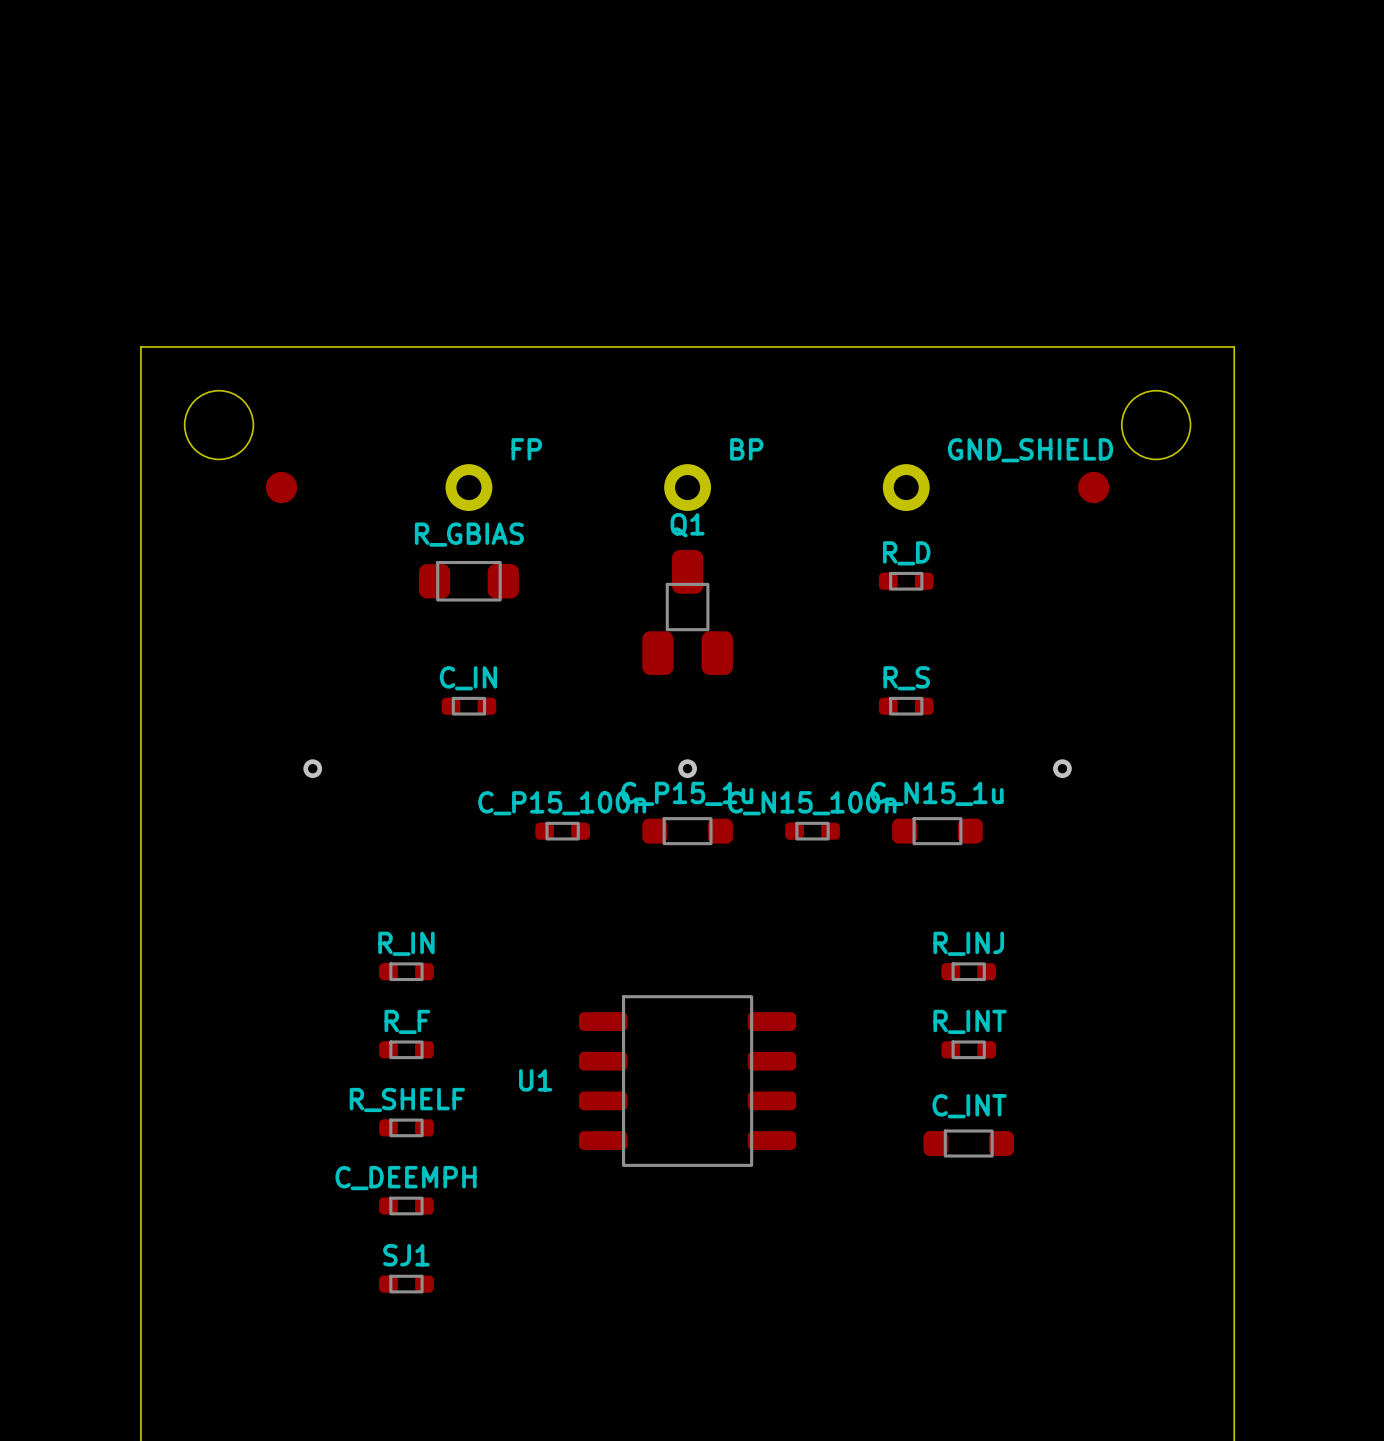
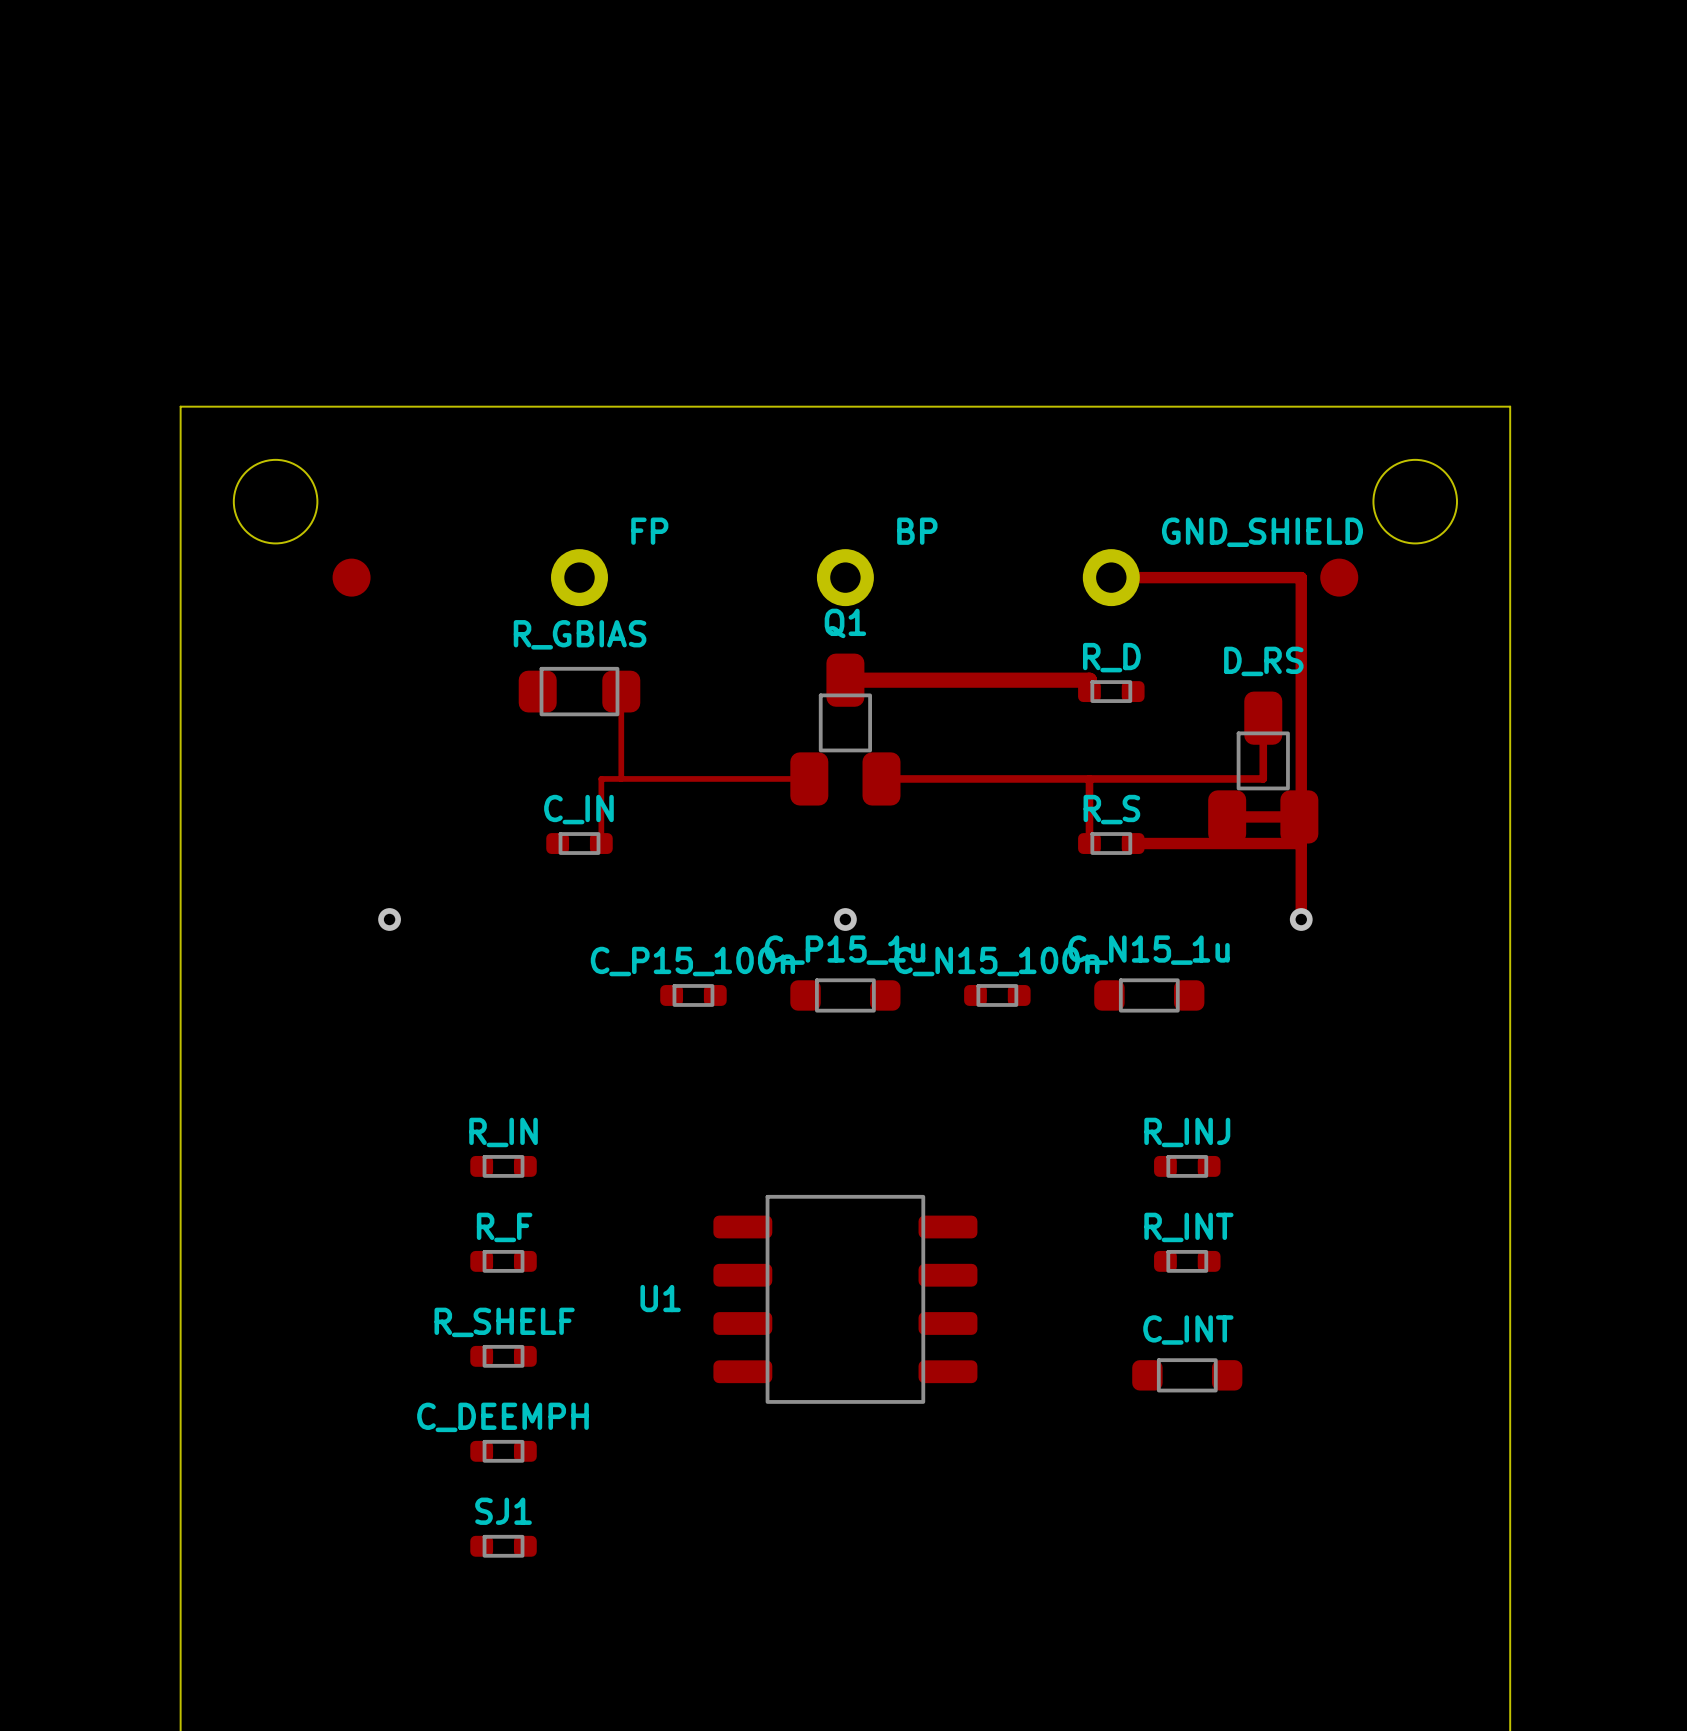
top track: none -> (1111, 577) (1301, 577) (1301, 919)
top track: none -> (845, 680) (1089, 680) (1089, 691)
top track: none -> (621, 691) (621, 778)
top track: none -> (1263, 718) (1263, 778) (881, 778)
D_RS: none -> (1263, 767)
top track: none -> (809, 778) (601, 778) (601, 843)
top track: none -> (1089, 778) (1089, 843)
top track: none -> (1227, 816) (1301, 816)
top track: none -> (1133, 843) (1301, 843)

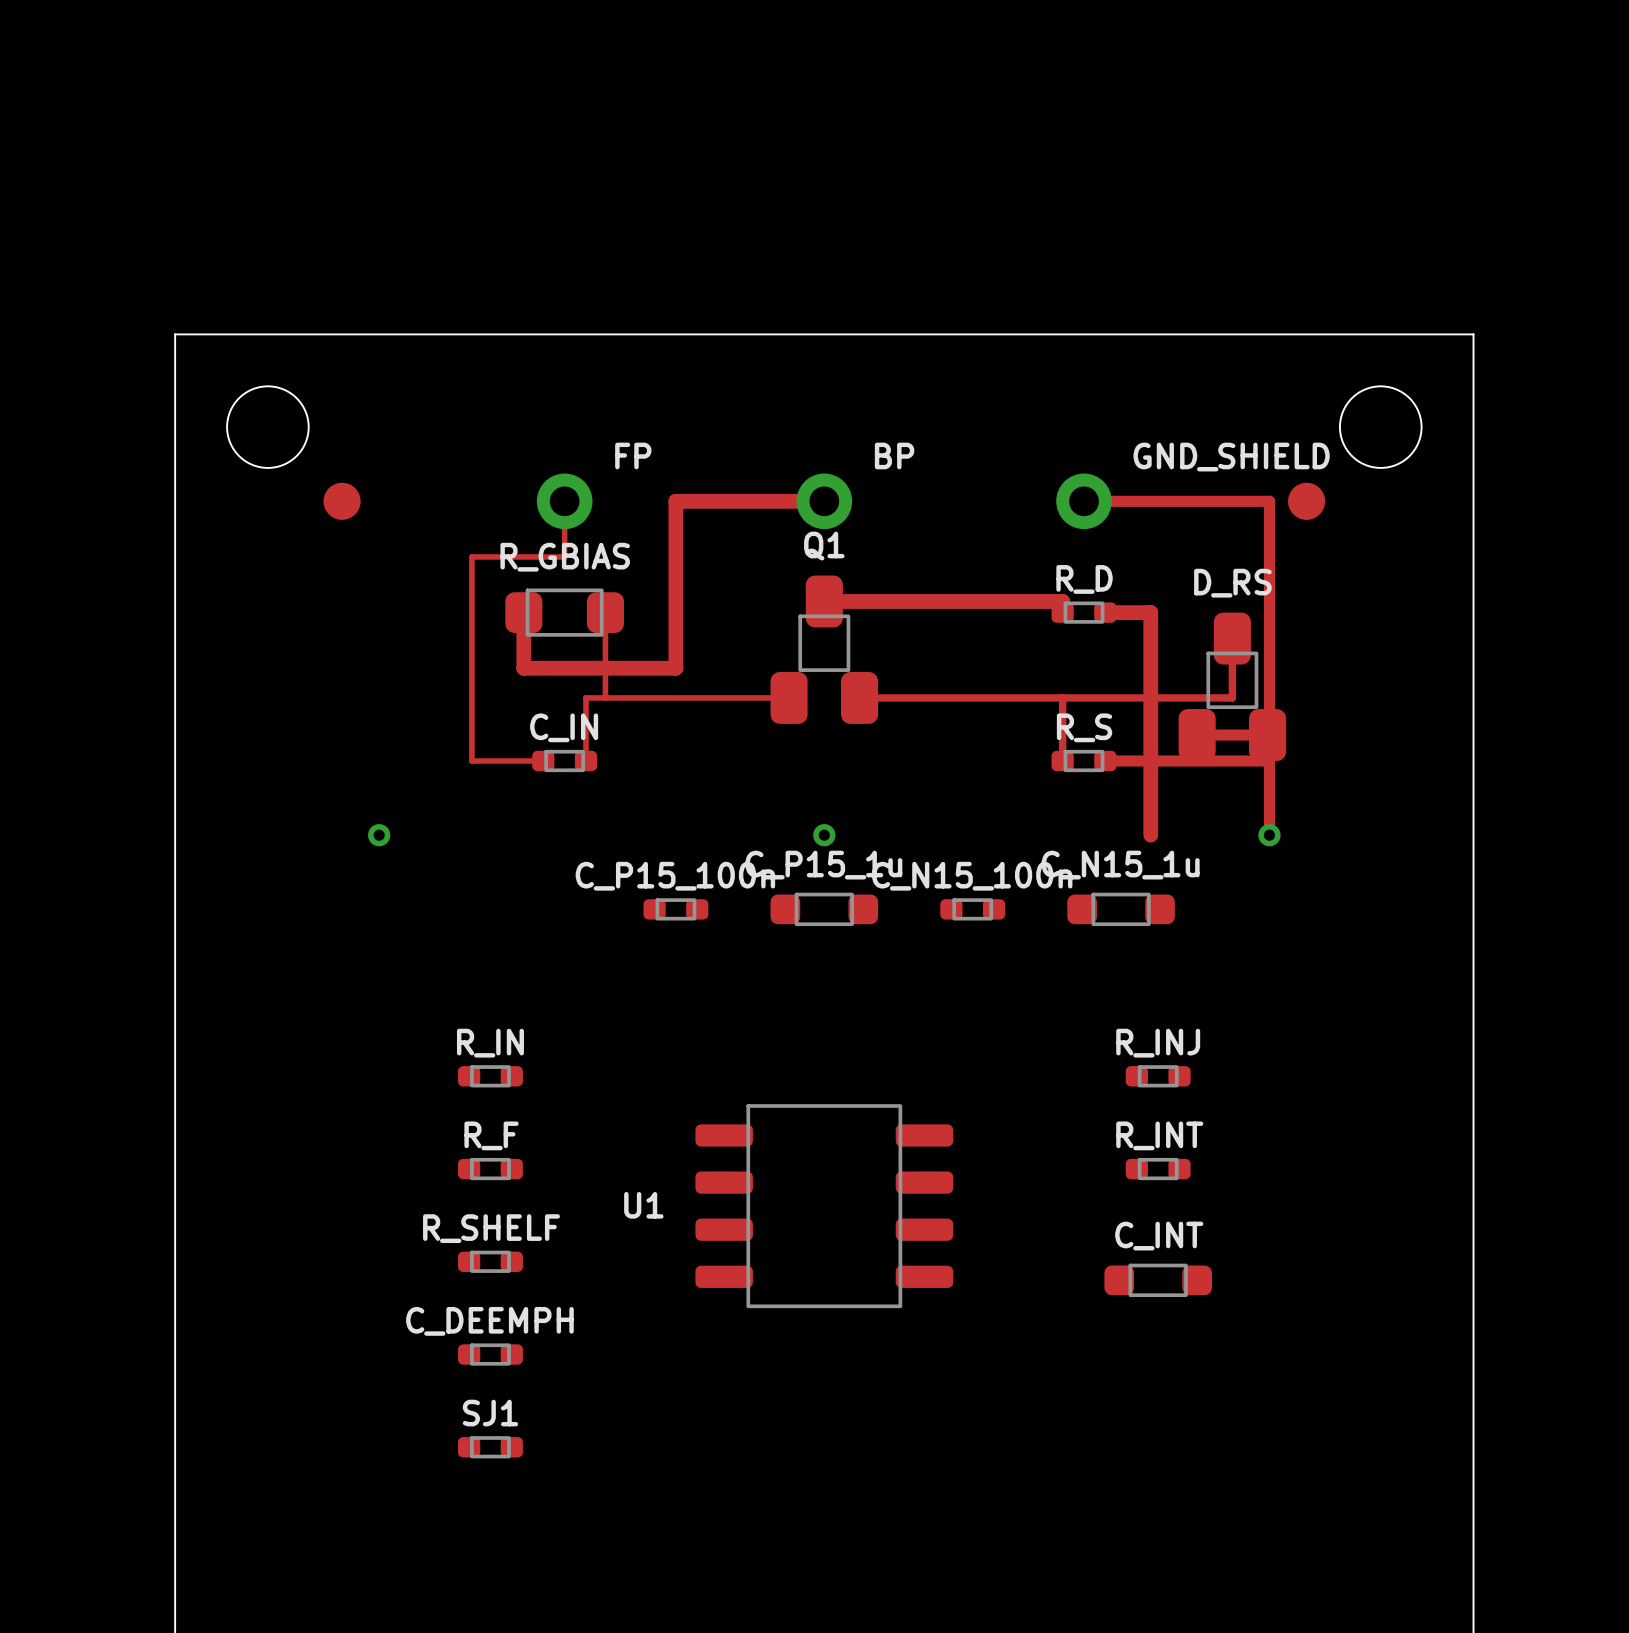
top track: none -> (564, 501) (564, 556) (471, 556) (471, 760) (543, 760)
top track: none -> (824, 501) (675, 501) (675, 668) (523, 668) (523, 612)
top track: none -> (1105, 612) (1150, 612) (1150, 835)

